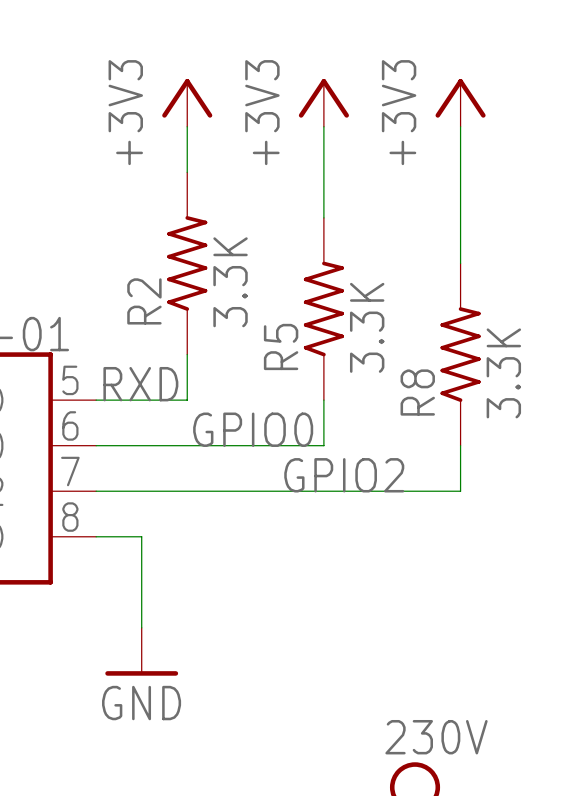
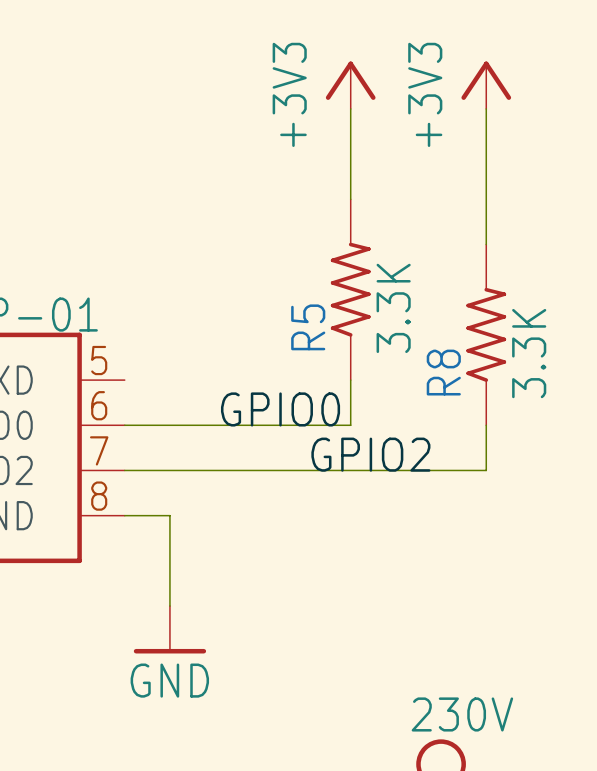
power symbol: +3V3 (187, 102) -> none
wire: (187, 126) (187, 172) -> none
R2: 3.3K (187, 263) -> none
wire: (187, 354) (187, 400) (96, 400) -> none
label: RXD (140, 384) -> none

